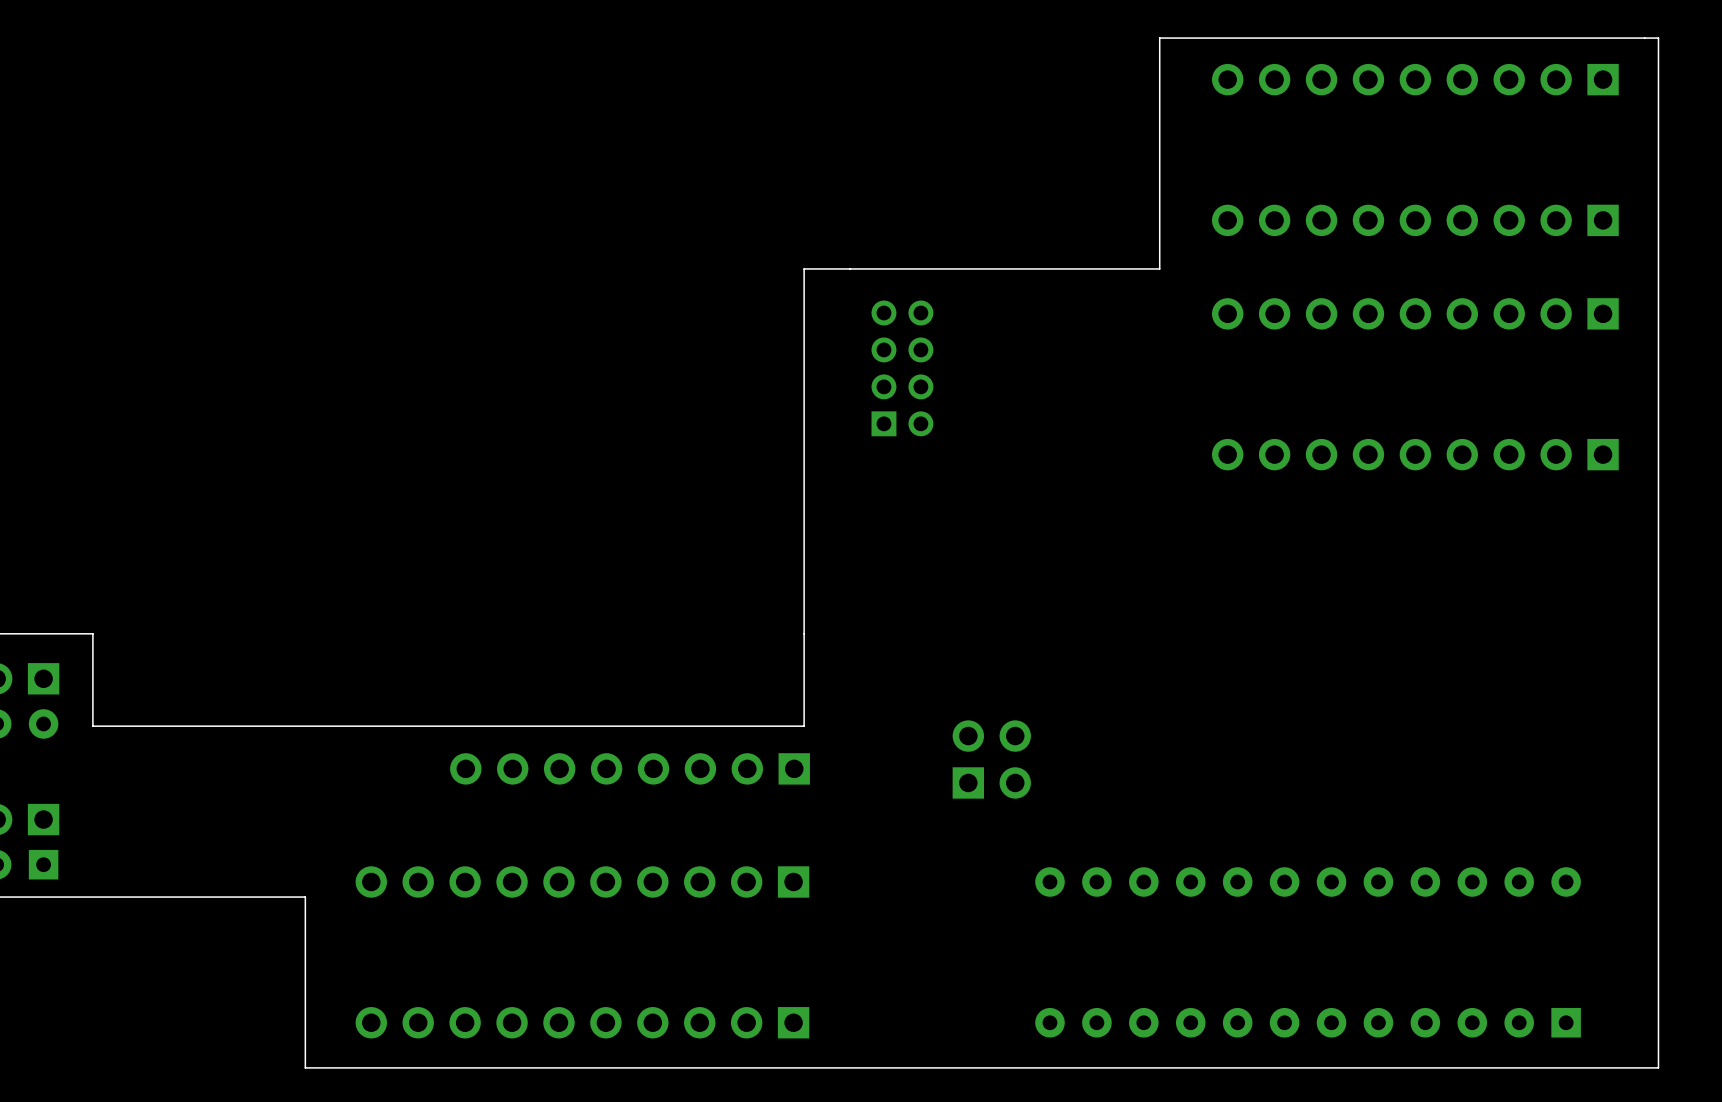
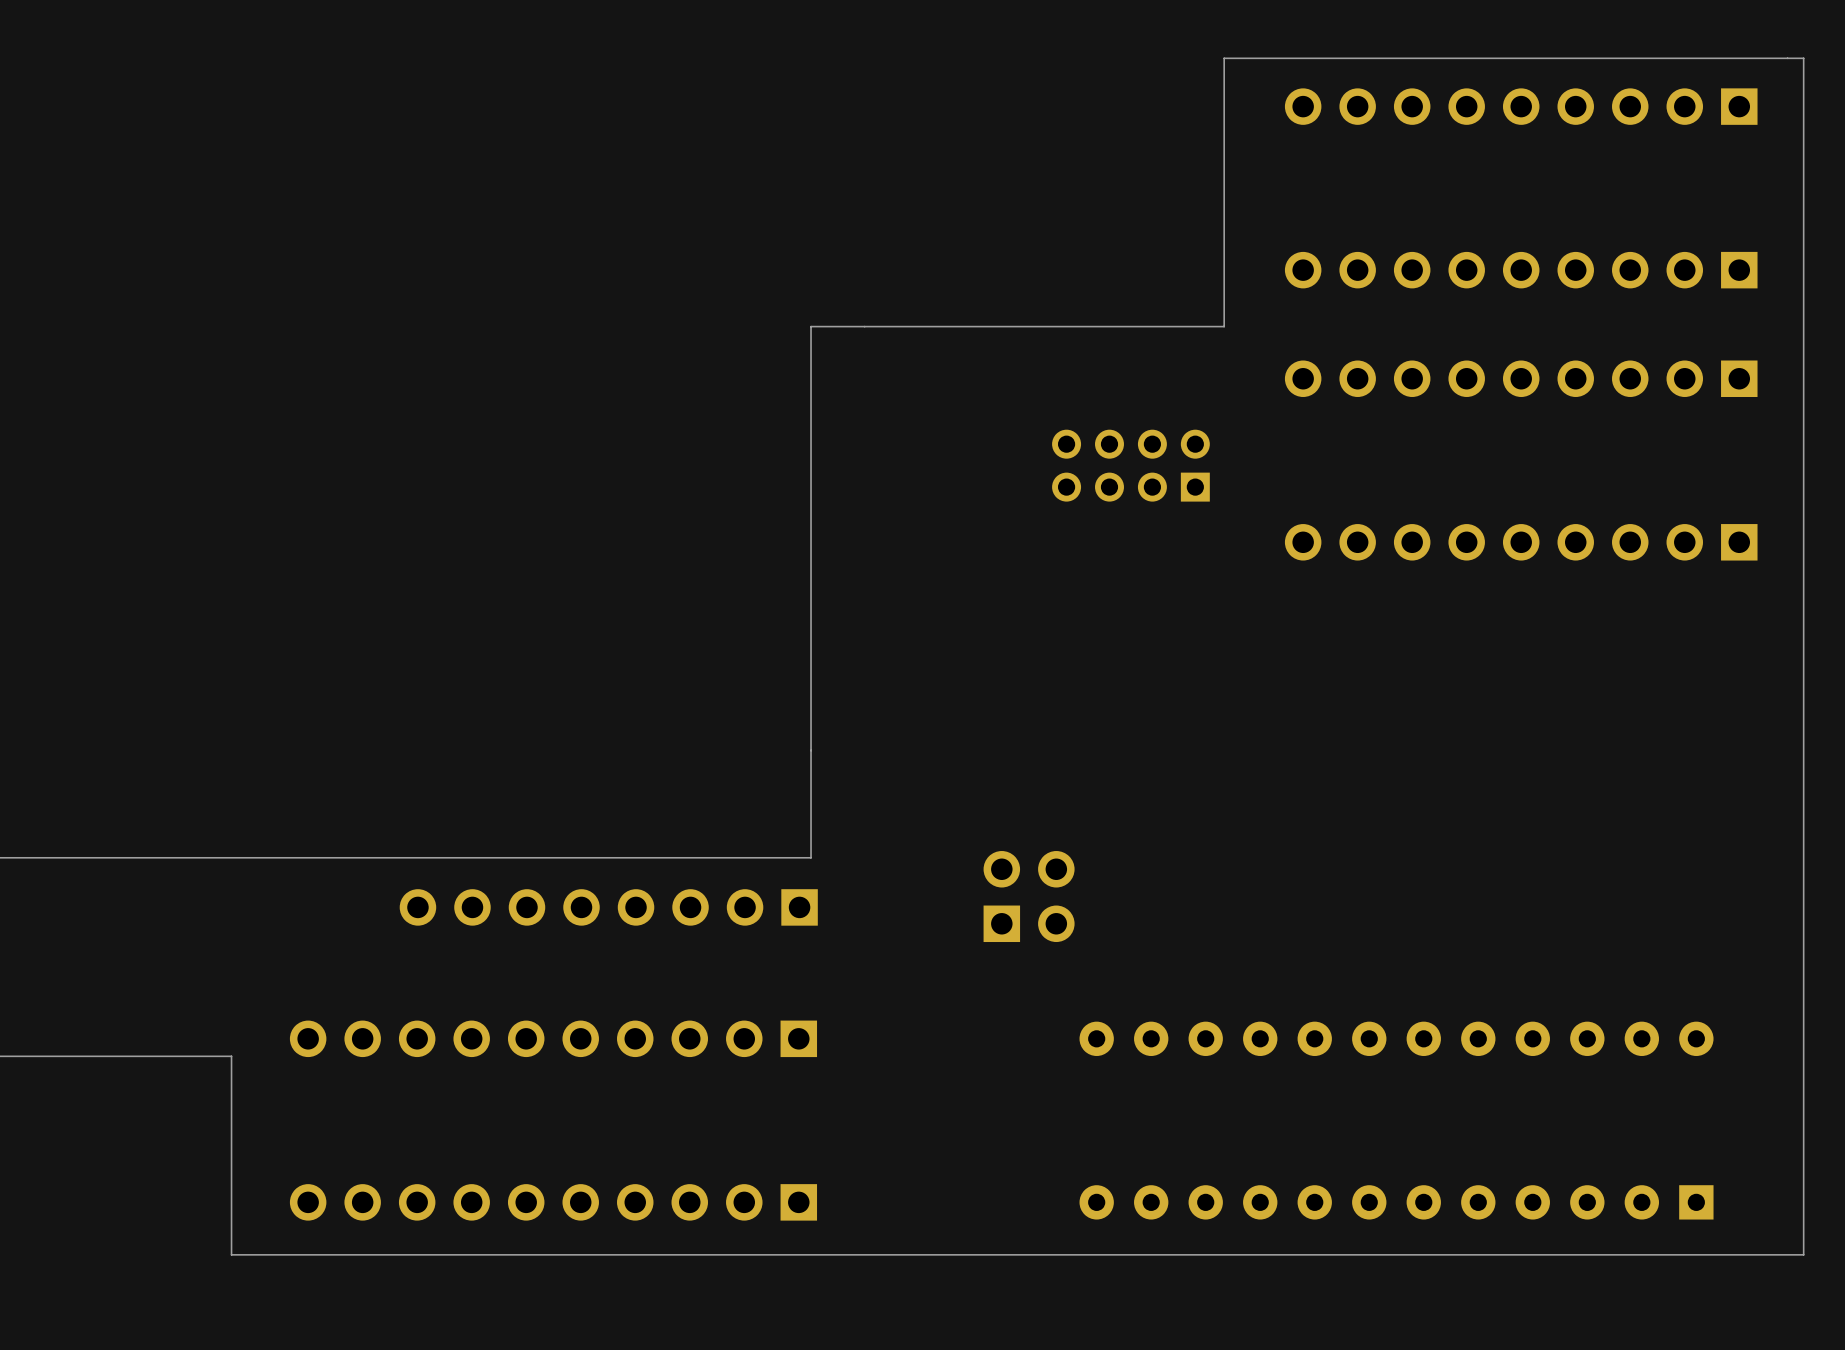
part rotation: 0° (902, 368) -> 90° counterclockwise (1130, 465)
part position: (902, 368) -> (1130, 465)

